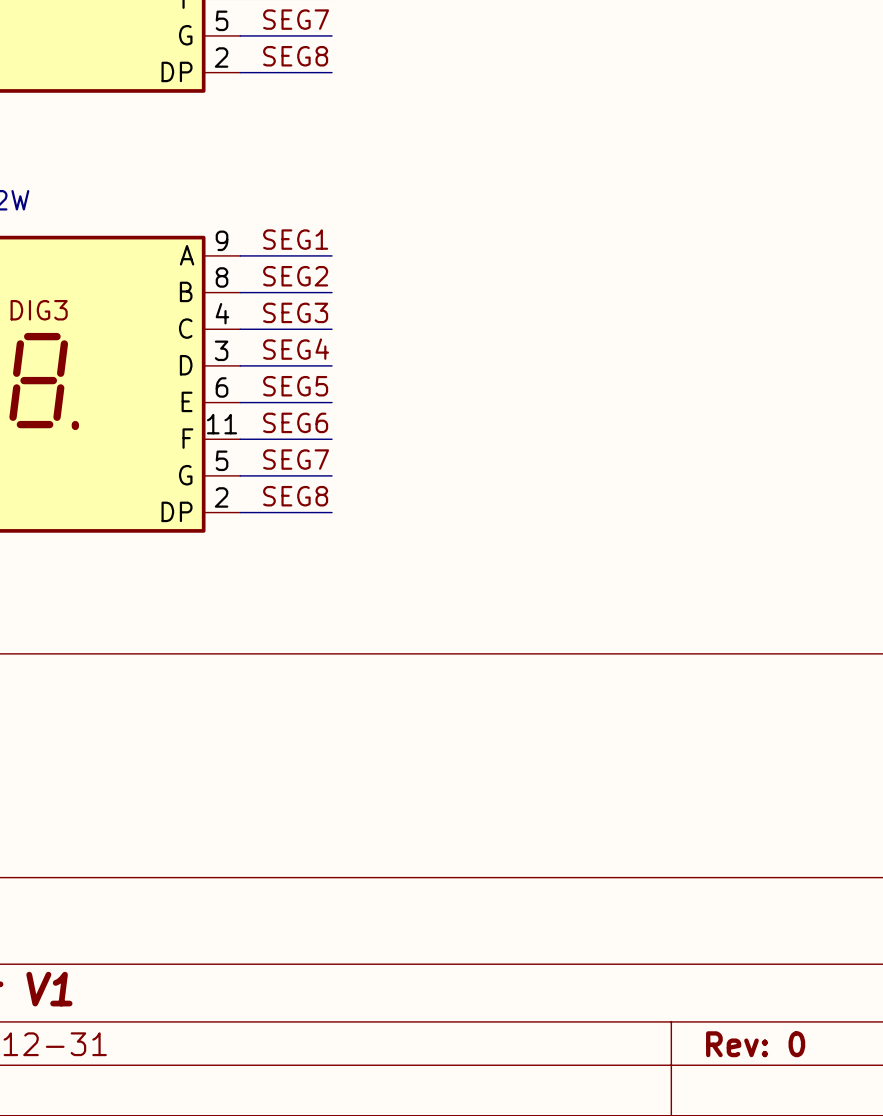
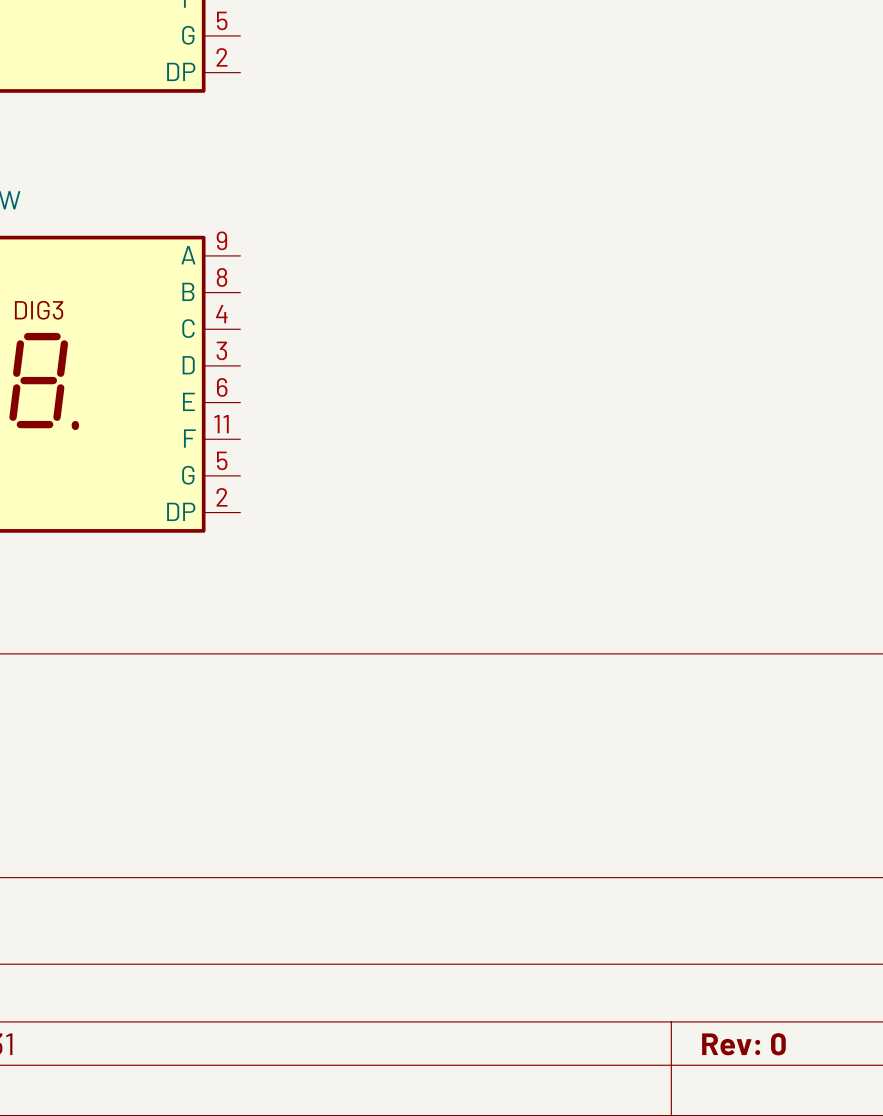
label: SEG7 (296, 19) -> none
wire: (240, 35) (332, 35) -> none
label: SEG8 (295, 56) -> none
wire: (240, 72) (332, 72) -> none
label: SEG1 (295, 239) -> none
wire: (240, 255) (332, 255) -> none
label: SEG2 (295, 276) -> none
wire: (240, 292) (332, 292) -> none
label: SEG3 (295, 312) -> none
wire: (240, 329) (332, 329) -> none
label: SEG4 (296, 349) -> none
wire: (240, 365) (332, 365) -> none
label: SEG5 (295, 386) -> none
wire: (240, 402) (332, 402) -> none
label: SEG6 (295, 422) -> none
wire: (240, 439) (332, 439) -> none
label: SEG7 (296, 459) -> none
wire: (240, 475) (332, 475) -> none
label: SEG8 (295, 496) -> none
wire: (240, 512) (332, 512) -> none

